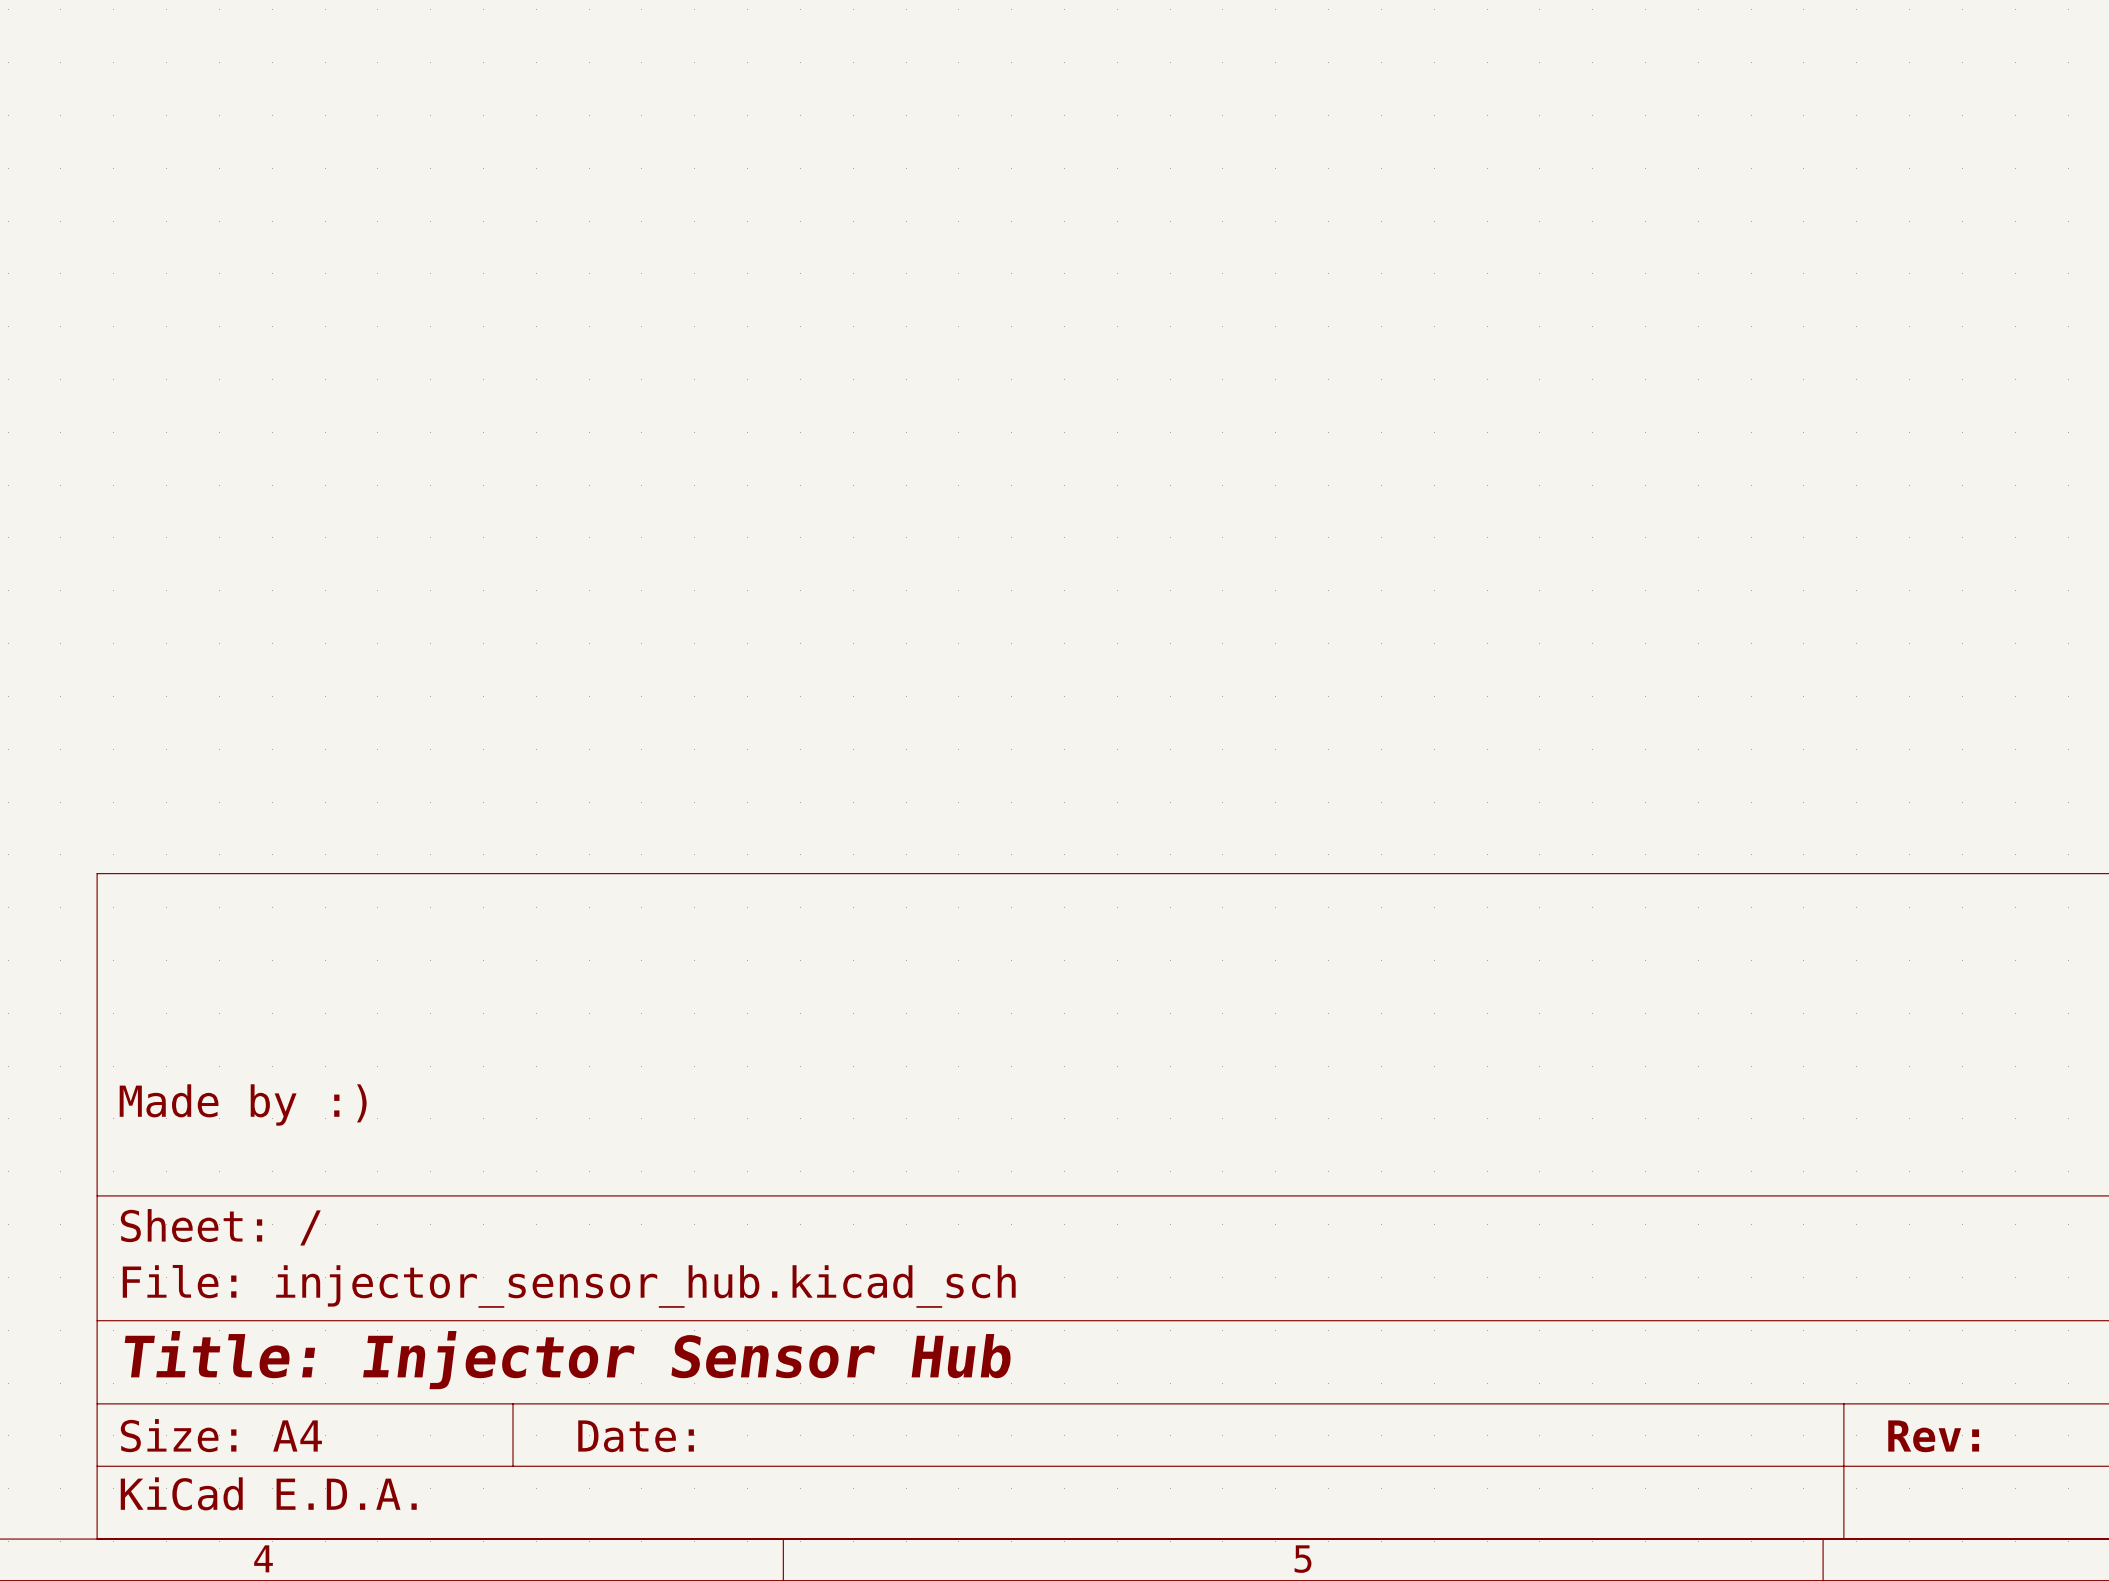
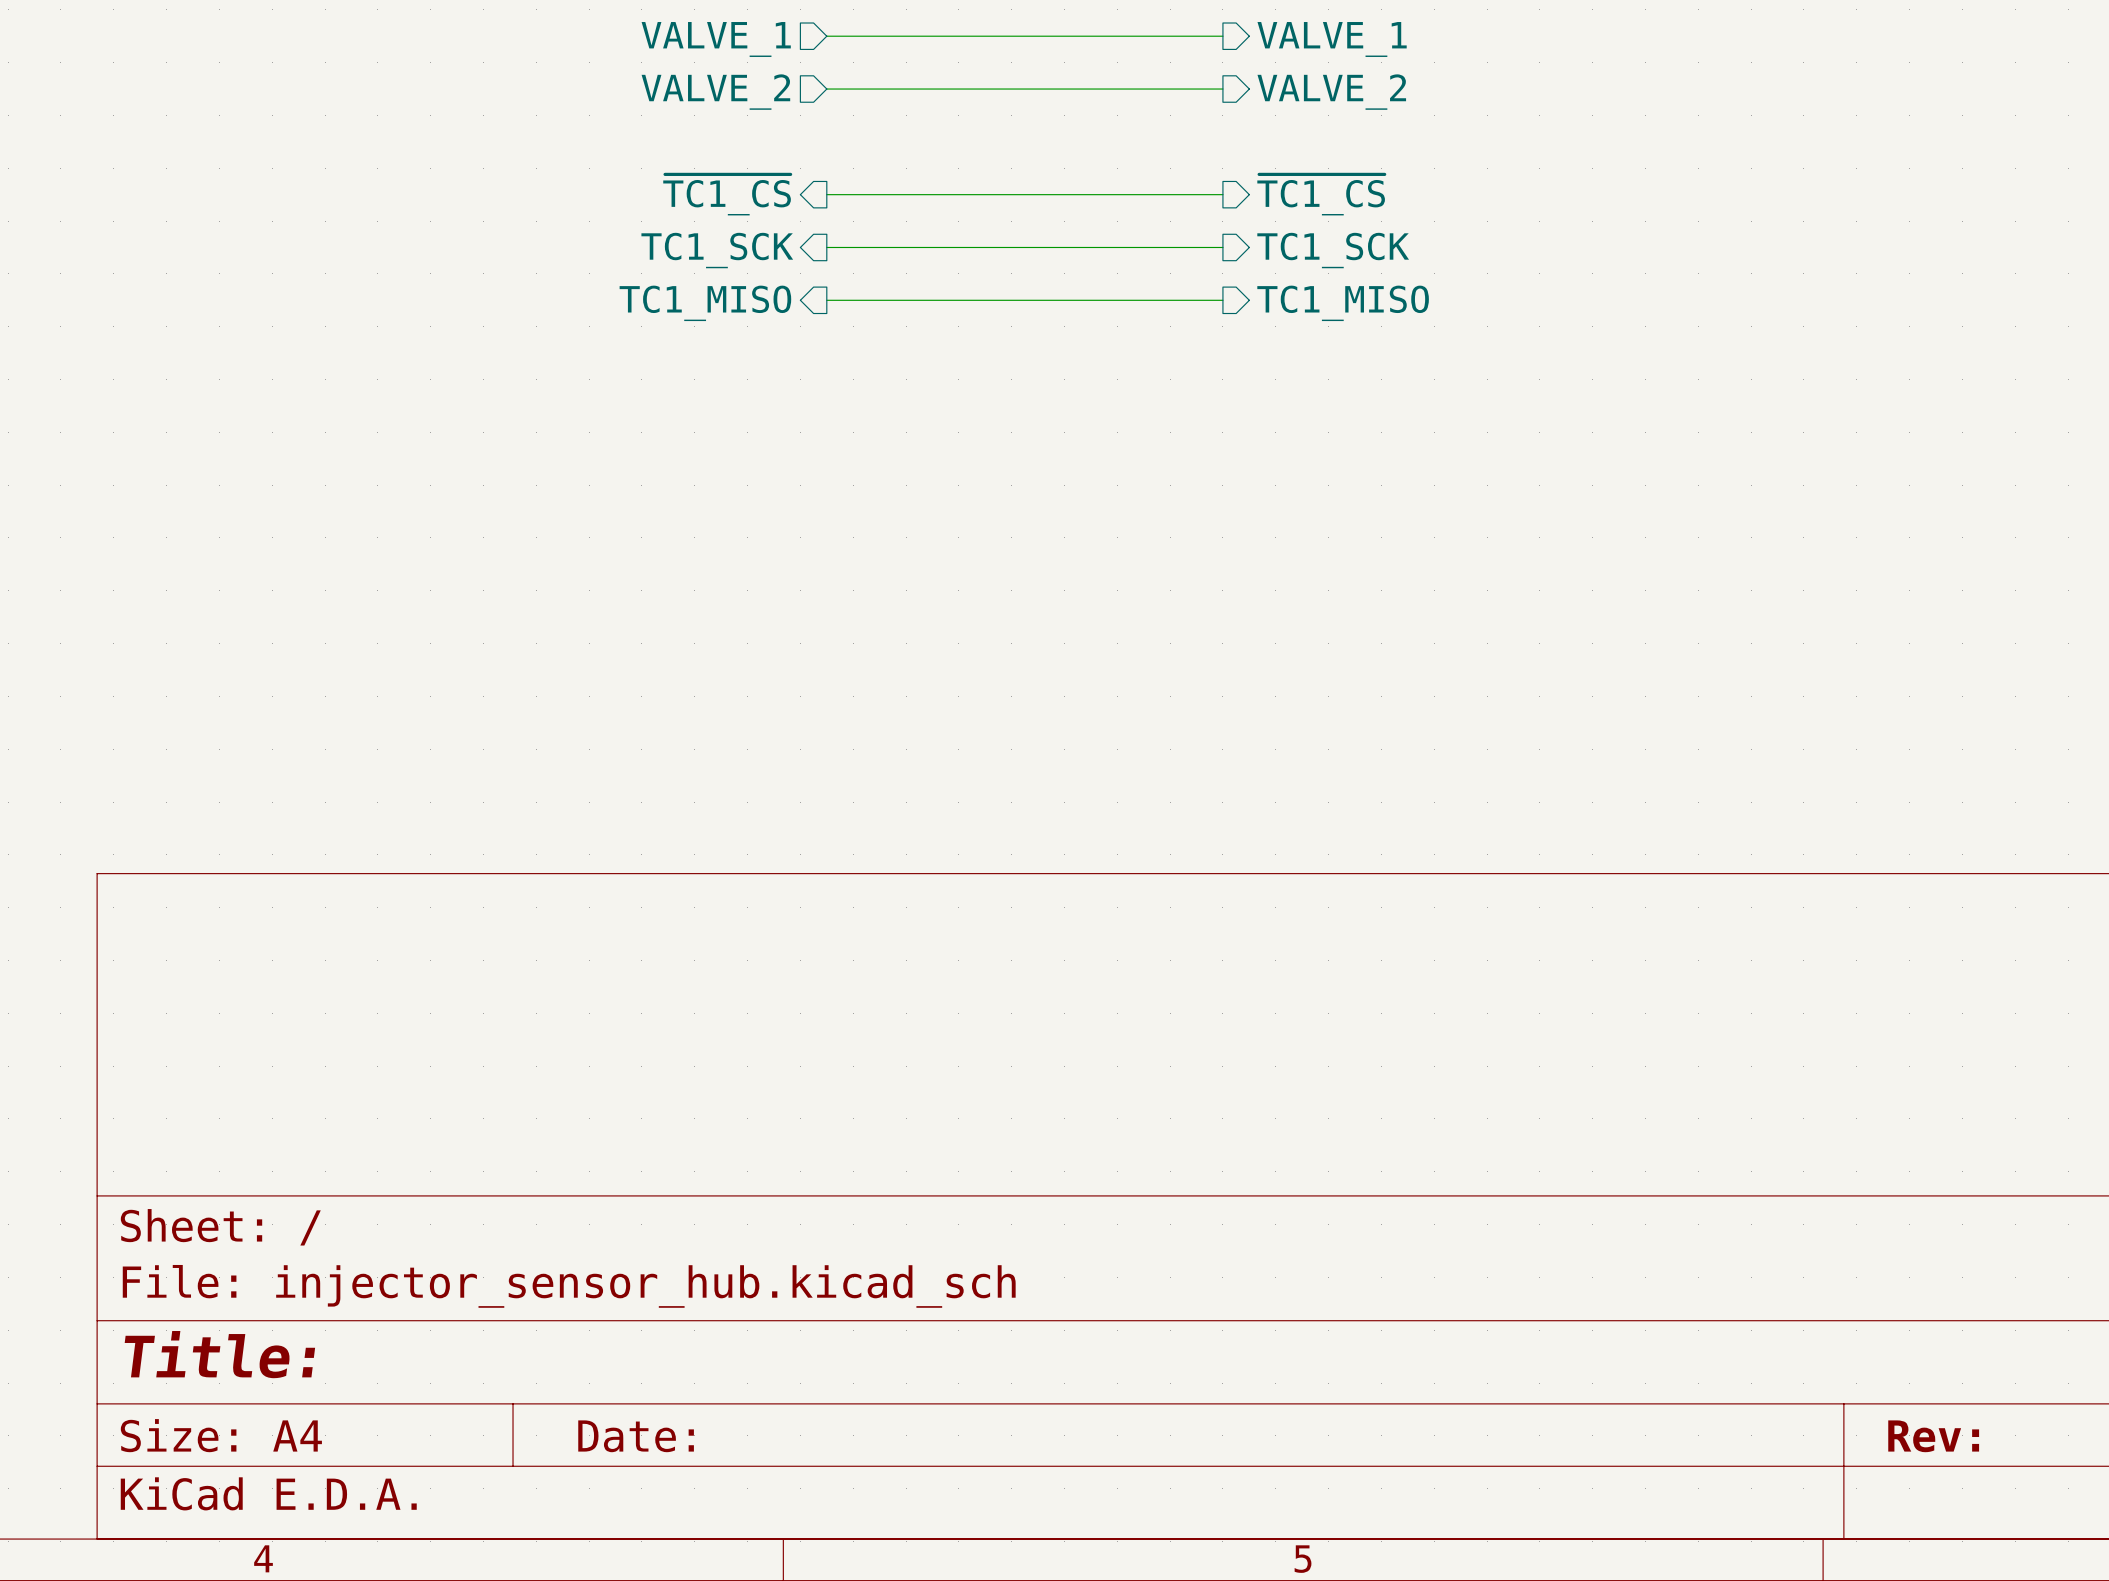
wire: none -> (826, 36) (1222, 36)
sheet pin: none -> VALVE_1 (716, 39)
sheet pin: none -> VALVE_1 (1332, 39)
wire: none -> (826, 89) (1222, 89)
sheet pin: none -> VALVE_2 (715, 92)
sheet pin: none -> VALVE_2 (1331, 92)
sheet pin: none -> ~{TC1_CS} (727, 194)
wire: none -> (826, 194) (1222, 194)
sheet pin: none -> ~{TC1_CS} (1321, 194)
wire: none -> (826, 247) (1222, 247)
sheet pin: none -> TC1_SCK (717, 250)
sheet pin: none -> TC1_SCK (1333, 250)
wire: none -> (826, 300) (1222, 300)
sheet pin: none -> TC1_MISO (705, 303)
sheet pin: none -> TC1_MISO (1343, 303)
title block: Made by :) (243, 1104) -> none
title block: Title: Injector Sensor Hub (568, 1360) -> Title: (219, 1354)

